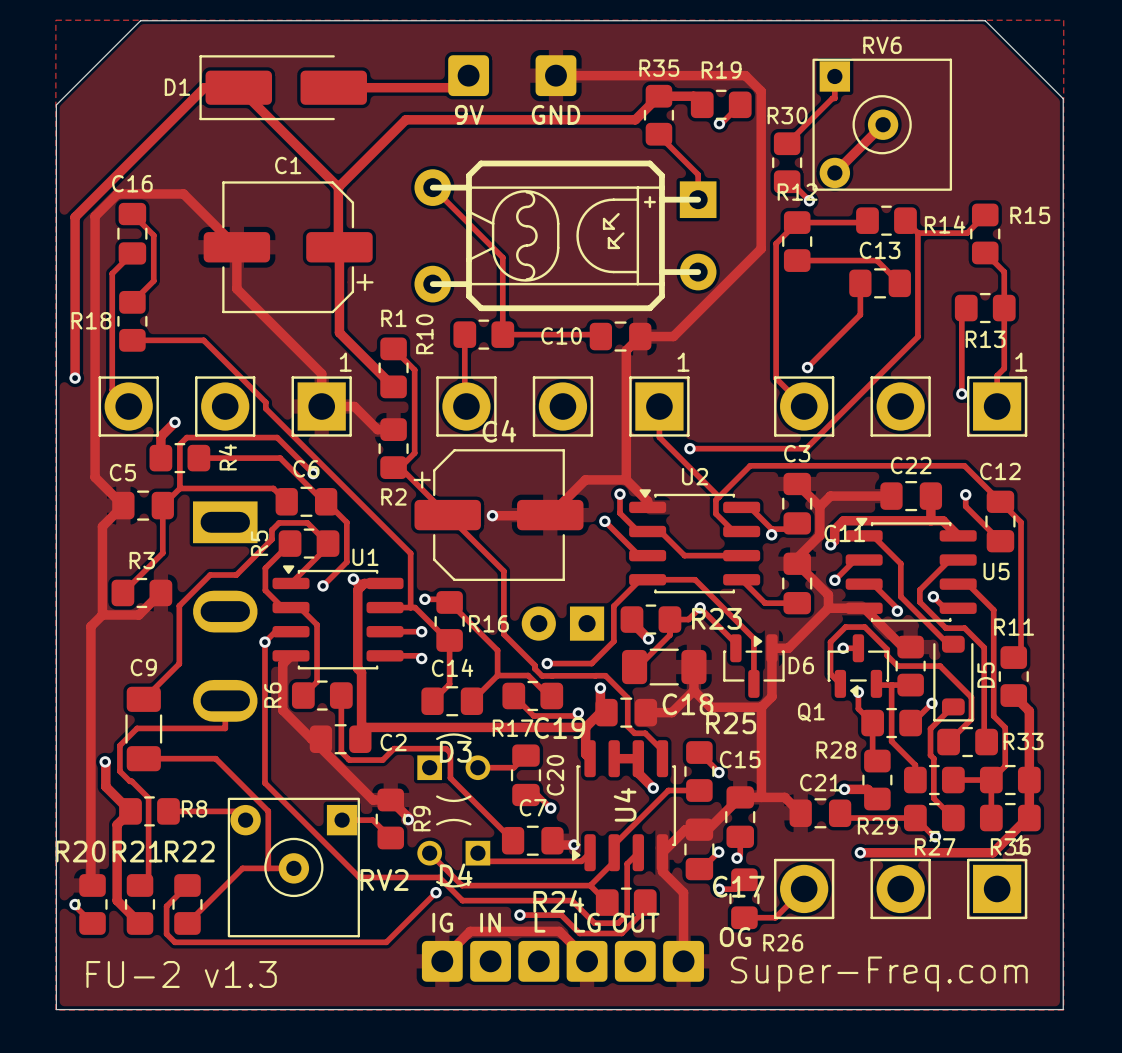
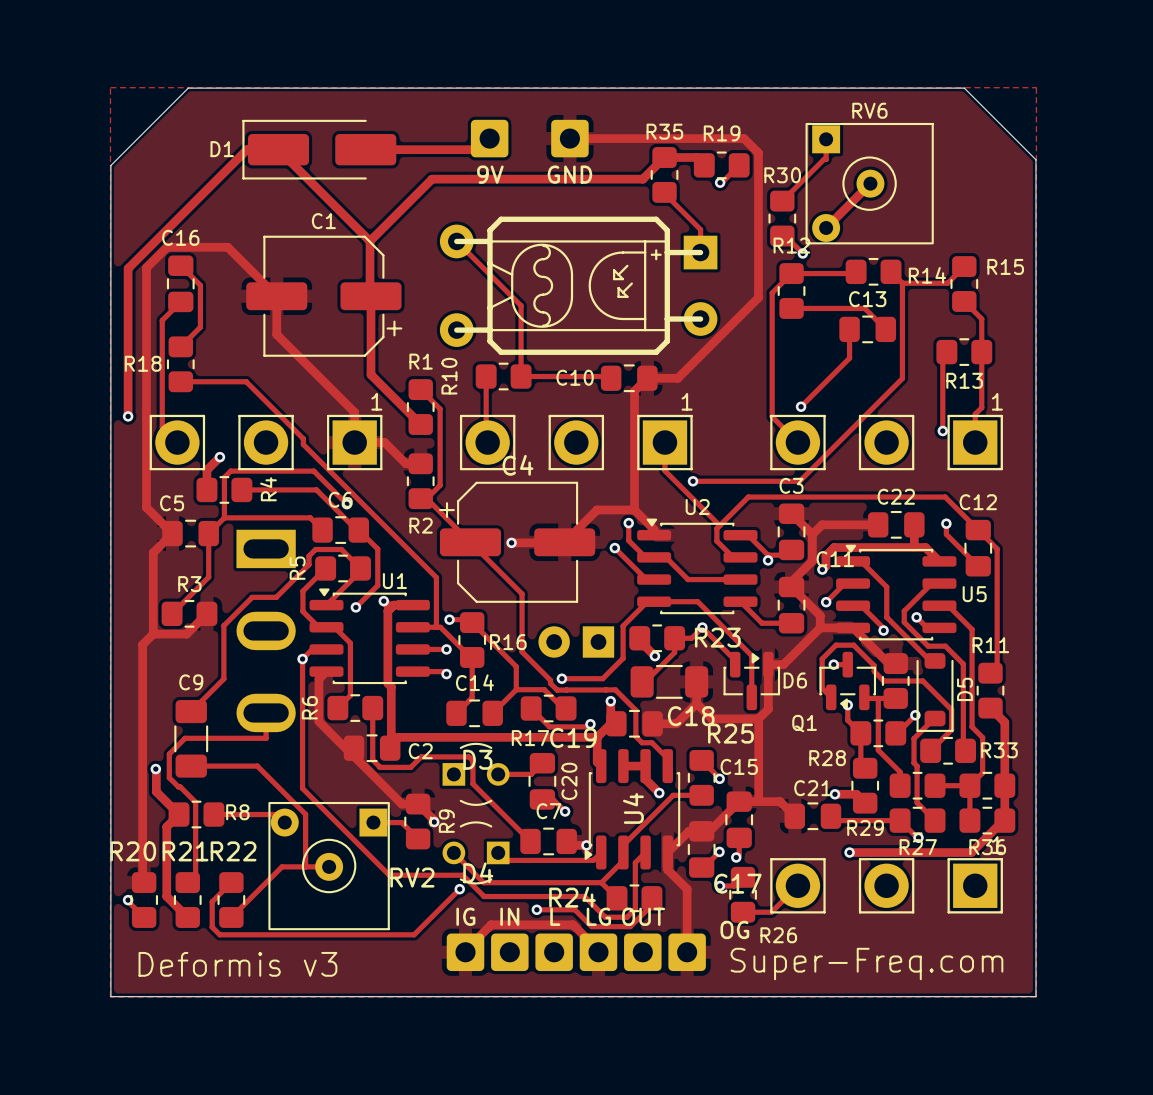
text: FU-2 v1.3 (181, 974) -> Deformis v3 (237, 964)

